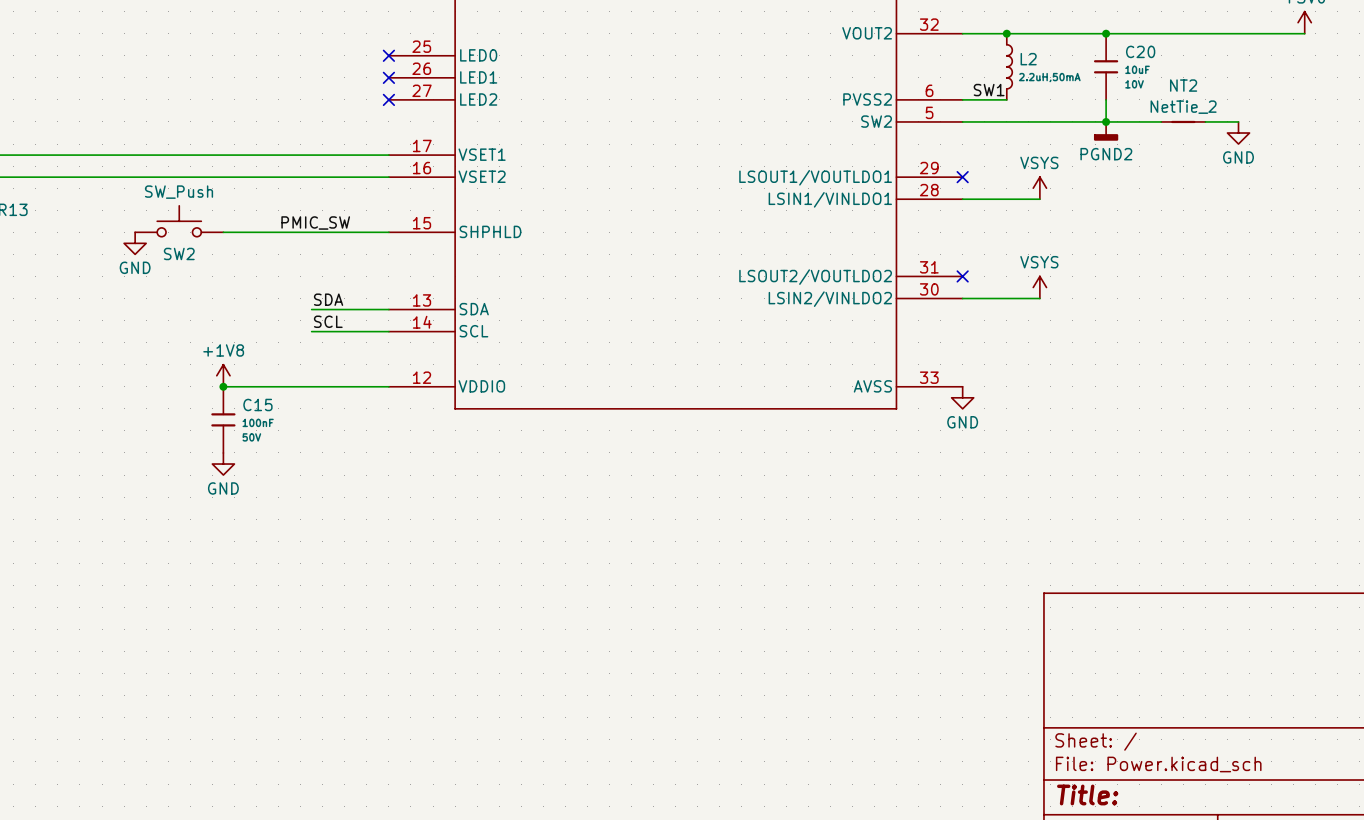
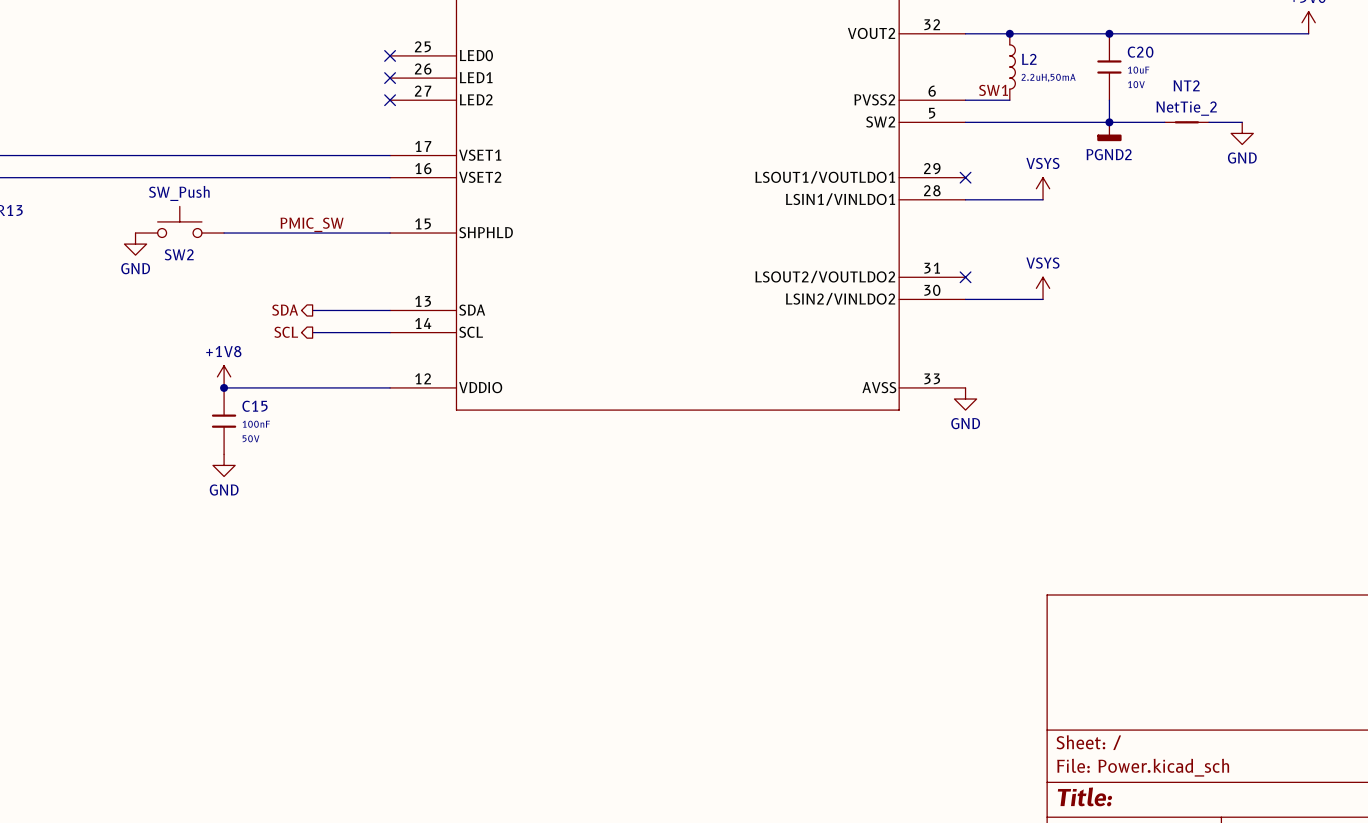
label: SDA (328, 299) -> none
hierarchical label: none -> SDA (285, 310)
label: SCL (328, 321) -> none
hierarchical label: none -> SCL (286, 332)

